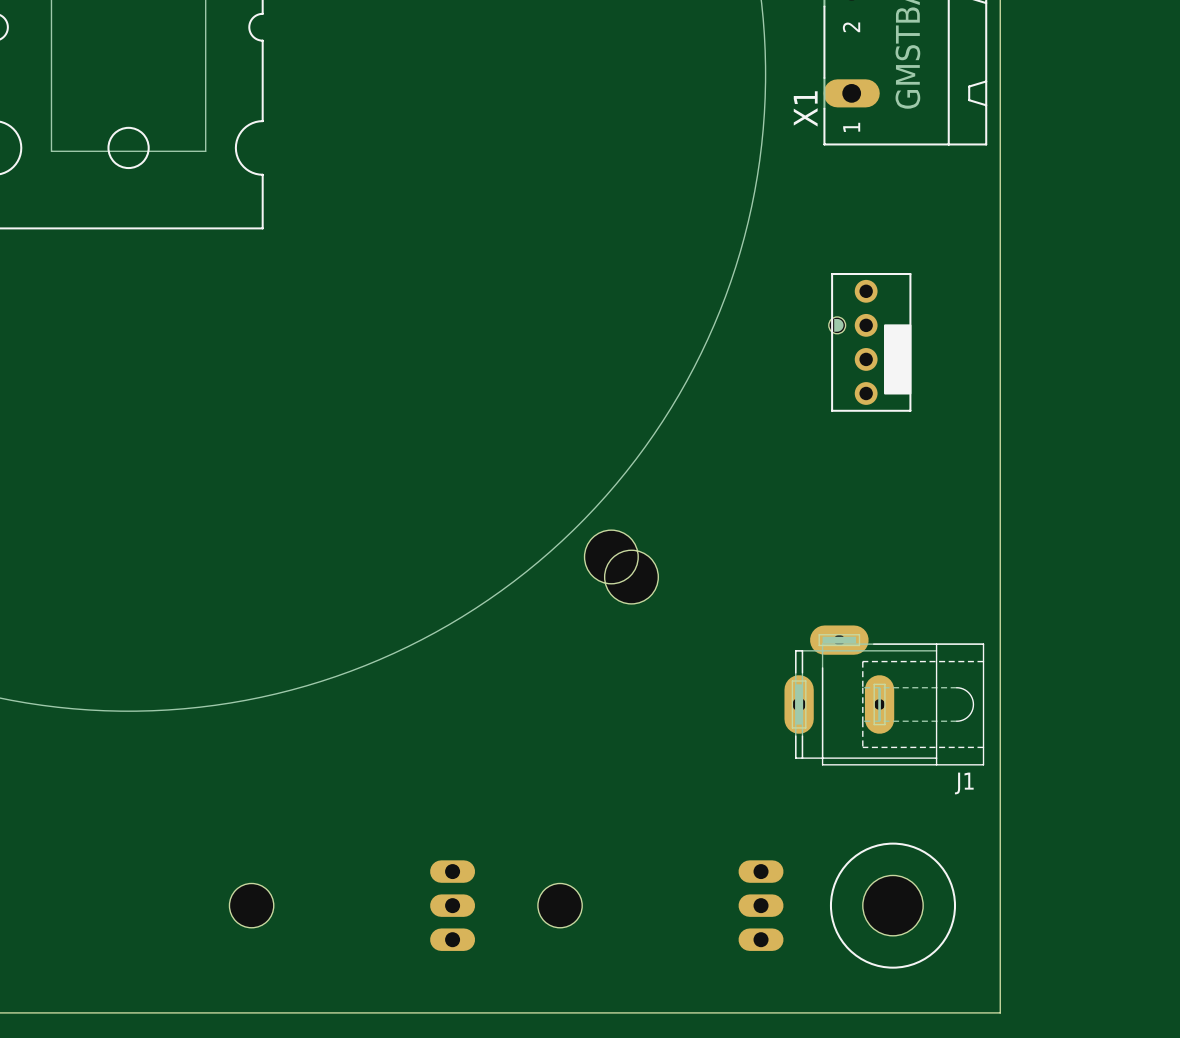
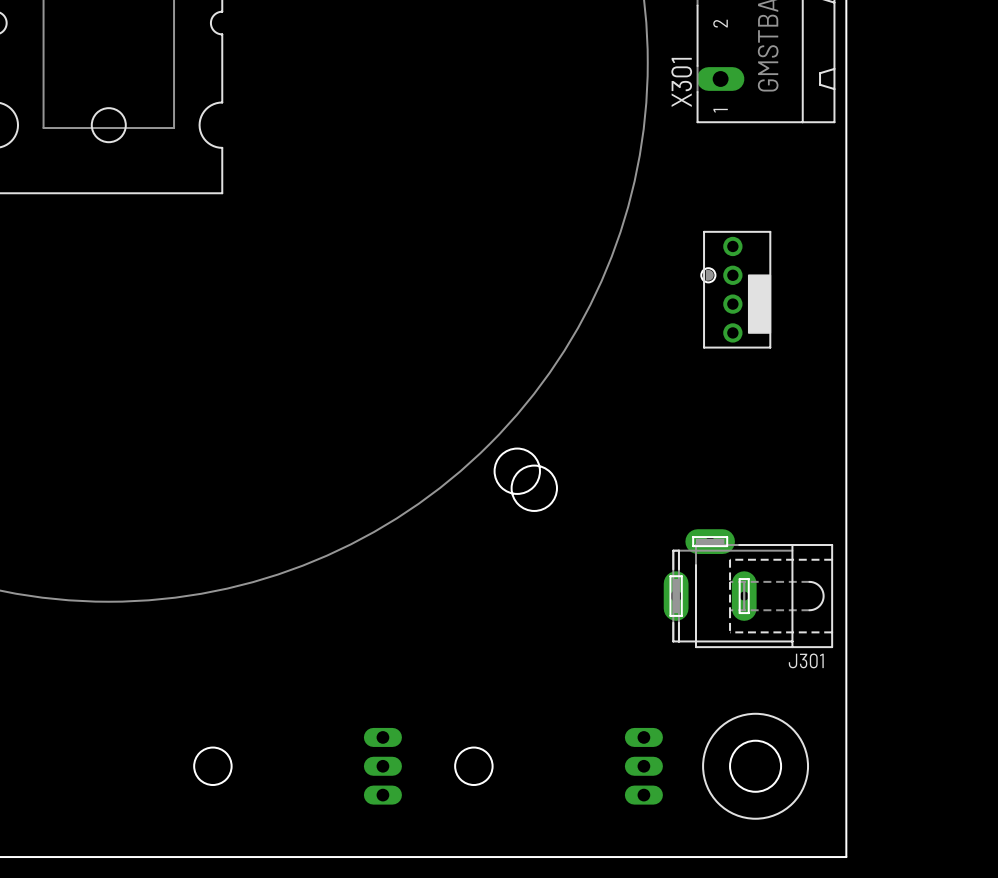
X1 name: X1 (805, 108) -> X301 (681, 82)
J1 name: J1 (964, 783) -> J301 (806, 660)

